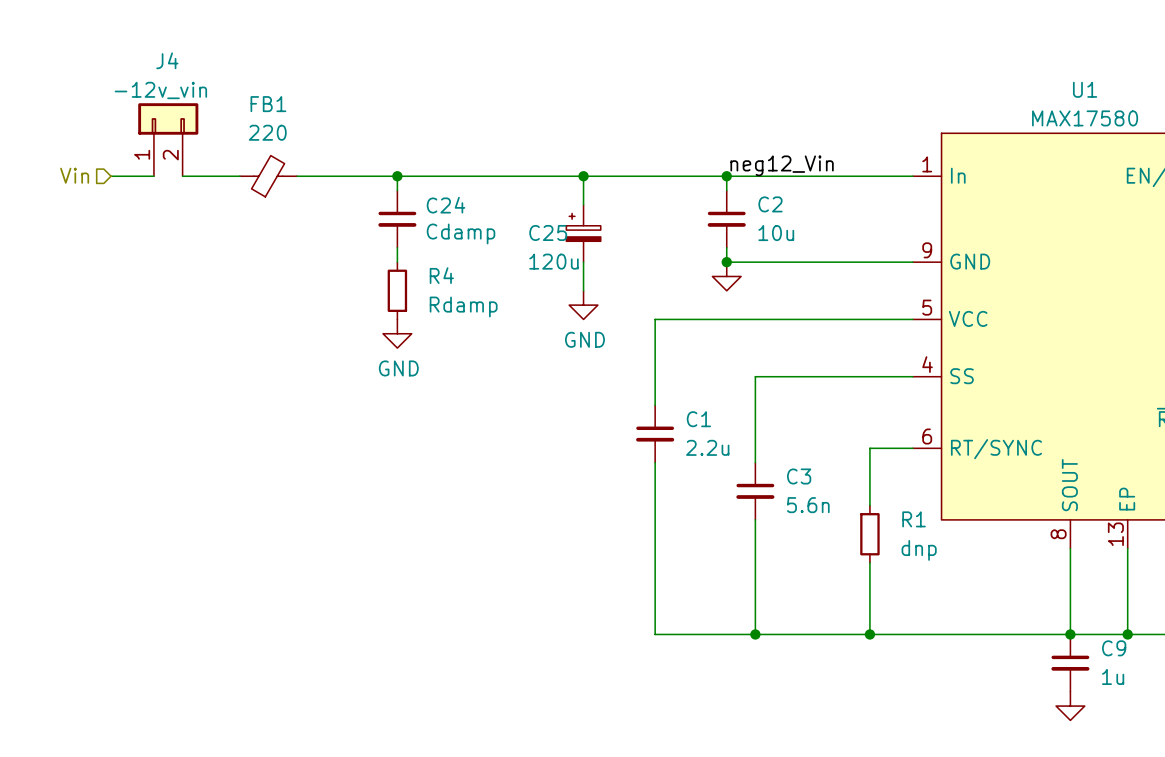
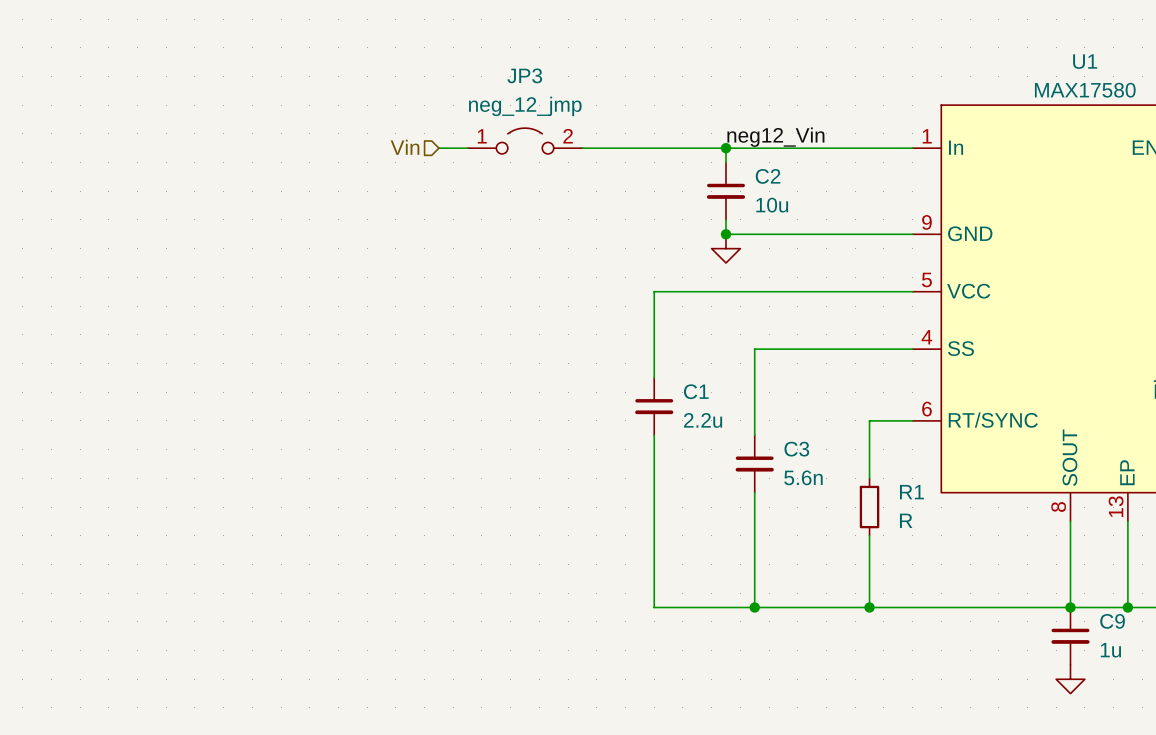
J4: -12v_vin (168, 139) -> none
JP3: none -> neg_12_jmp (525, 141)
hierarchical label: Vin (74, 175) -> none
hierarchical label: none -> Vin (404, 147)
wire: (110, 176) (153, 176) -> none
wire: (182, 176) (239, 176) -> none
FB1: 220 (268, 176) -> none
wire: (297, 176) (440, 176) -> none
wire: (397, 176) (397, 190) -> none
junction: (397, 176) -> none
wire: (468, 176) (583, 176) (583, 204) -> none
junction: (583, 176) -> none
C24: Cdamp (397, 219) -> none
C25: 120u (583, 233) -> none
wire: (397, 247) (397, 262) -> none
wire: (583, 262) (583, 290) -> none
R4: Rdamp (397, 290) -> none
power symbol: GND (583, 305) -> none
power symbol: GND (397, 333) -> none
R1 value: dnp (919, 550) -> R (906, 520)

